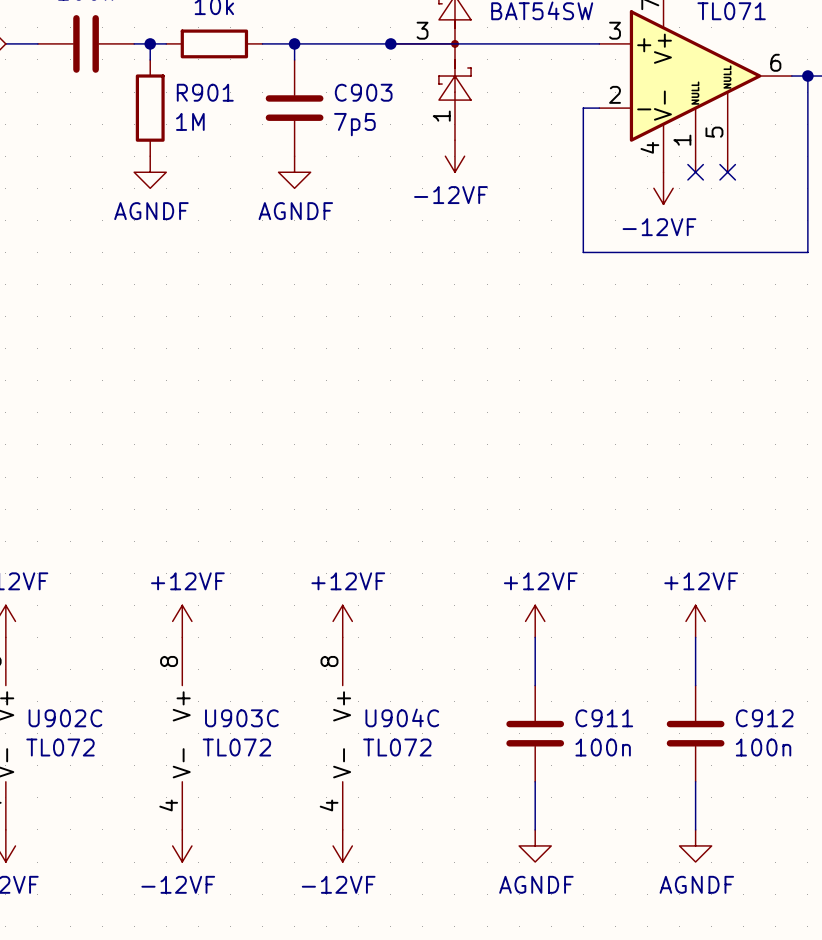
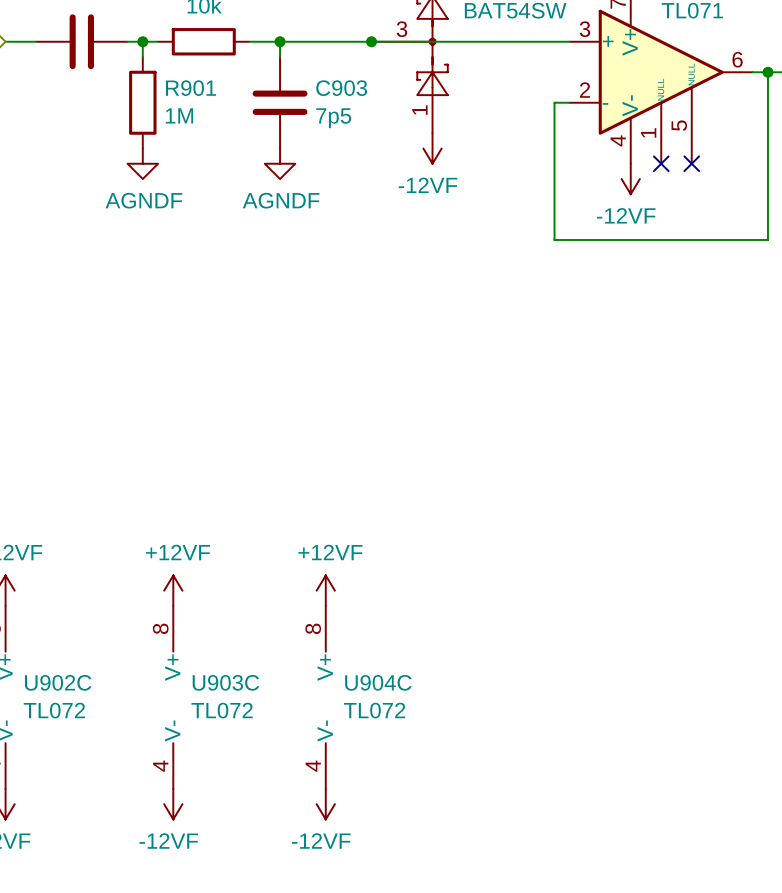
power symbol: +12VF (535, 621) -> none
power symbol: +12VF (695, 621) -> none
wire: (535, 637) (535, 685) -> none
wire: (695, 637) (695, 685) -> none
C911: 100n (535, 733) -> none
C912: 100n (695, 733) -> none
wire: (535, 781) (535, 829) -> none
wire: (695, 781) (695, 829) -> none
power symbol: AGNDF (535, 845) -> none
power symbol: AGNDF (695, 845) -> none

